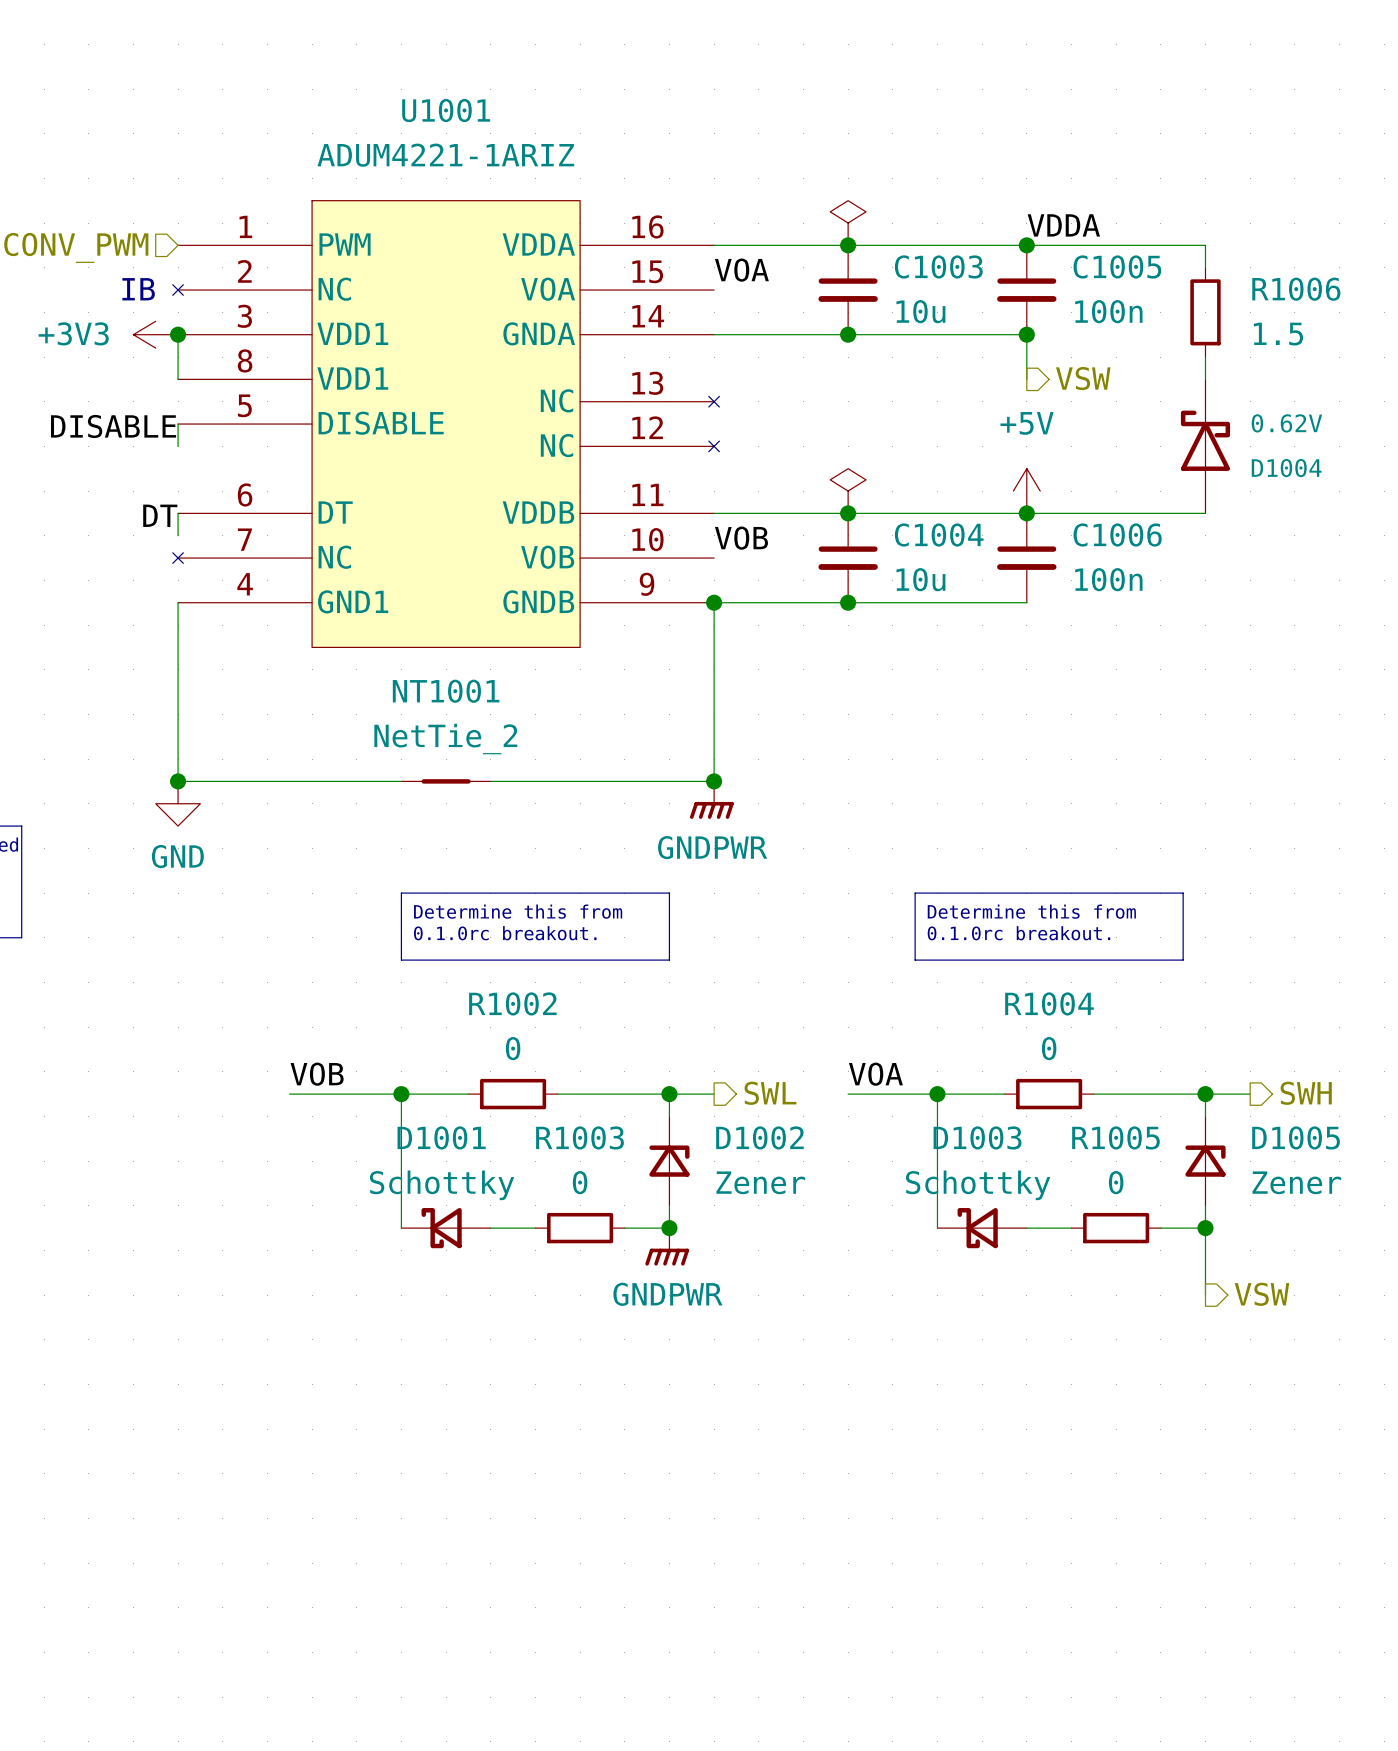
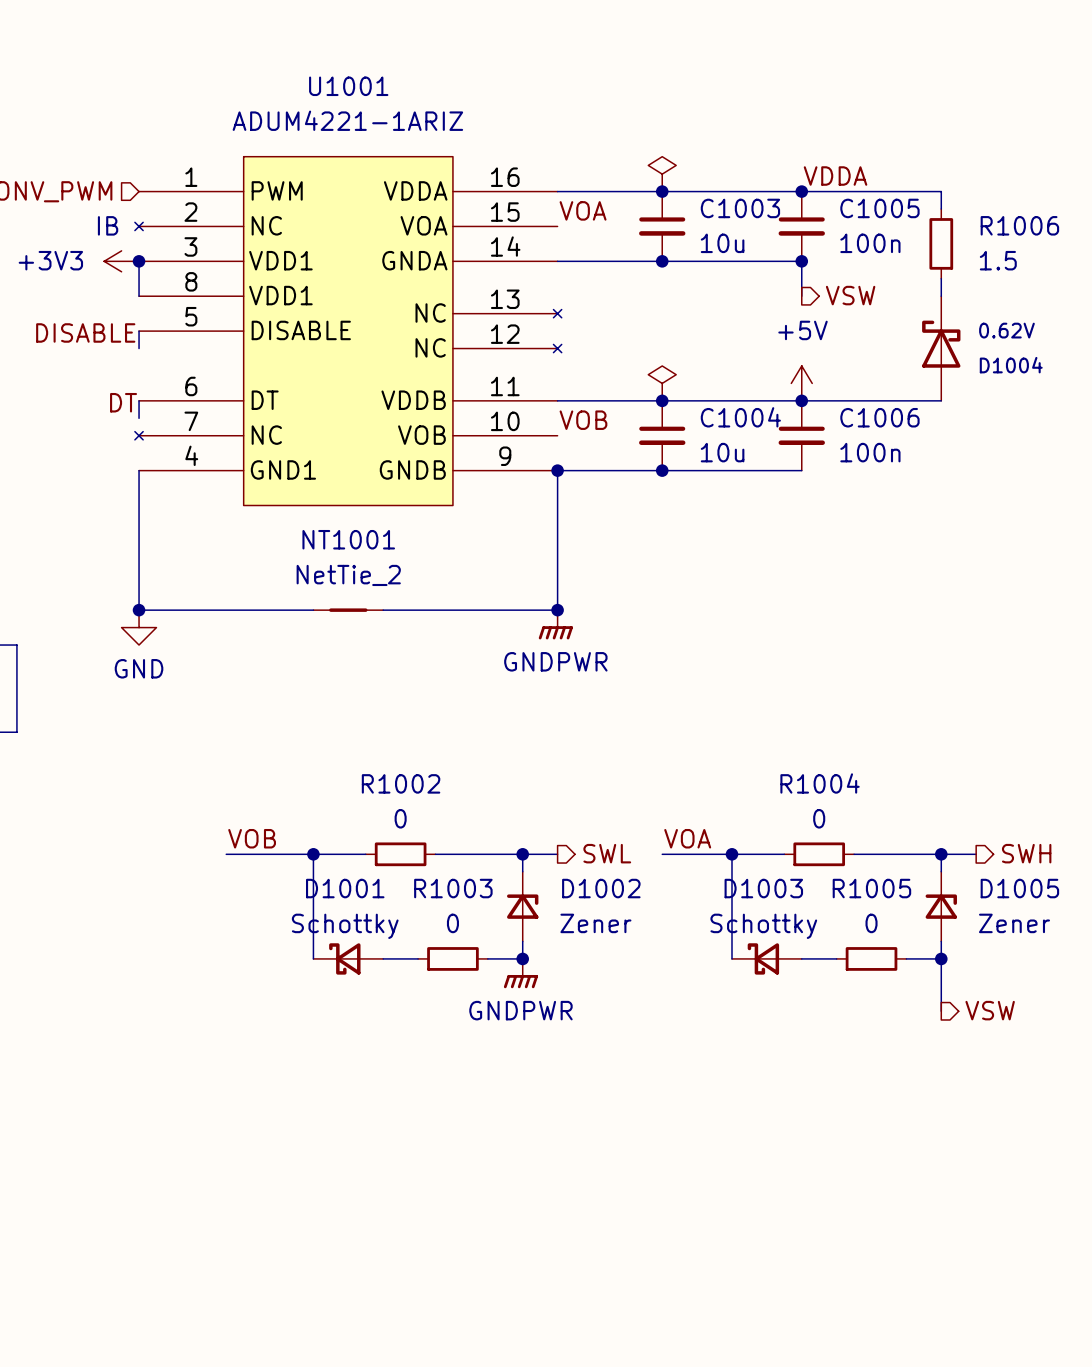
line: (401, 893) (669, 893) (669, 960) (401, 960) (401, 893) -> none
line: (915, 893) (1183, 893) (1183, 960) (915, 960) (915, 893) -> none
text: Determine this from (518, 911) -> none
text: Determine this from (1031, 911) -> none
text: 0.1.0rc breakout. (505, 933) -> none
text: 0.1.0rc breakout. (1018, 933) -> none

